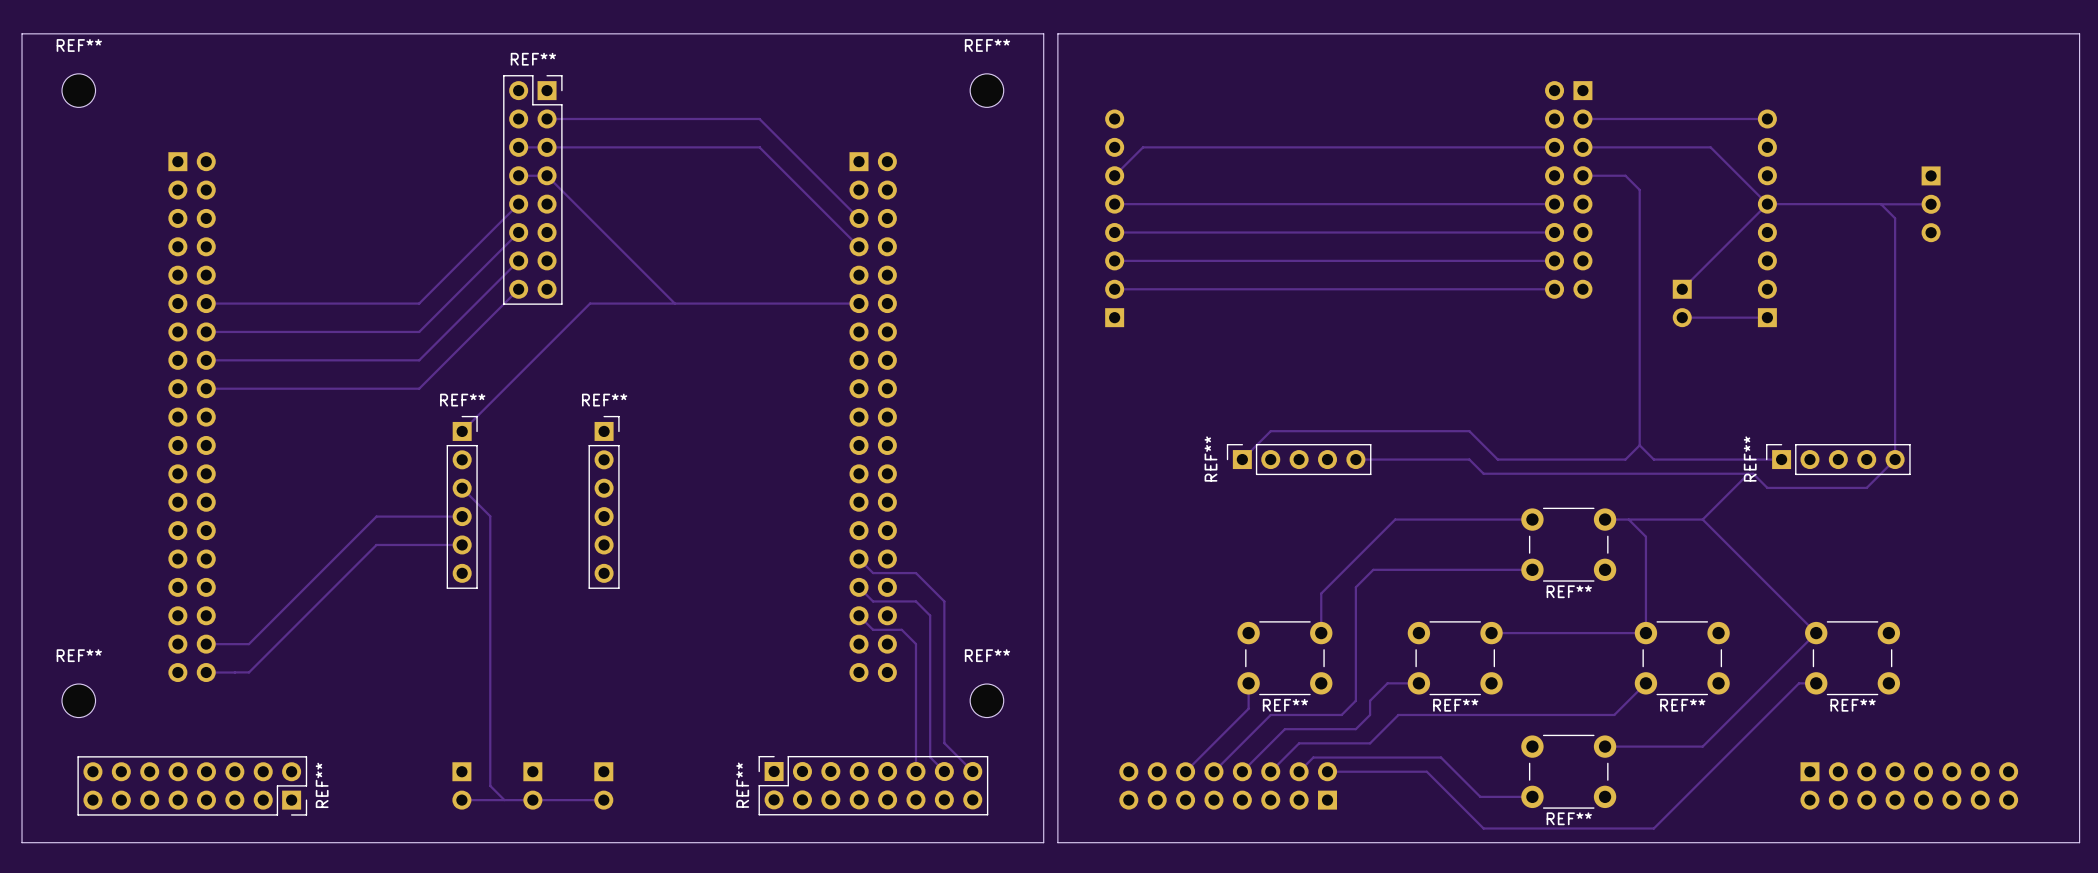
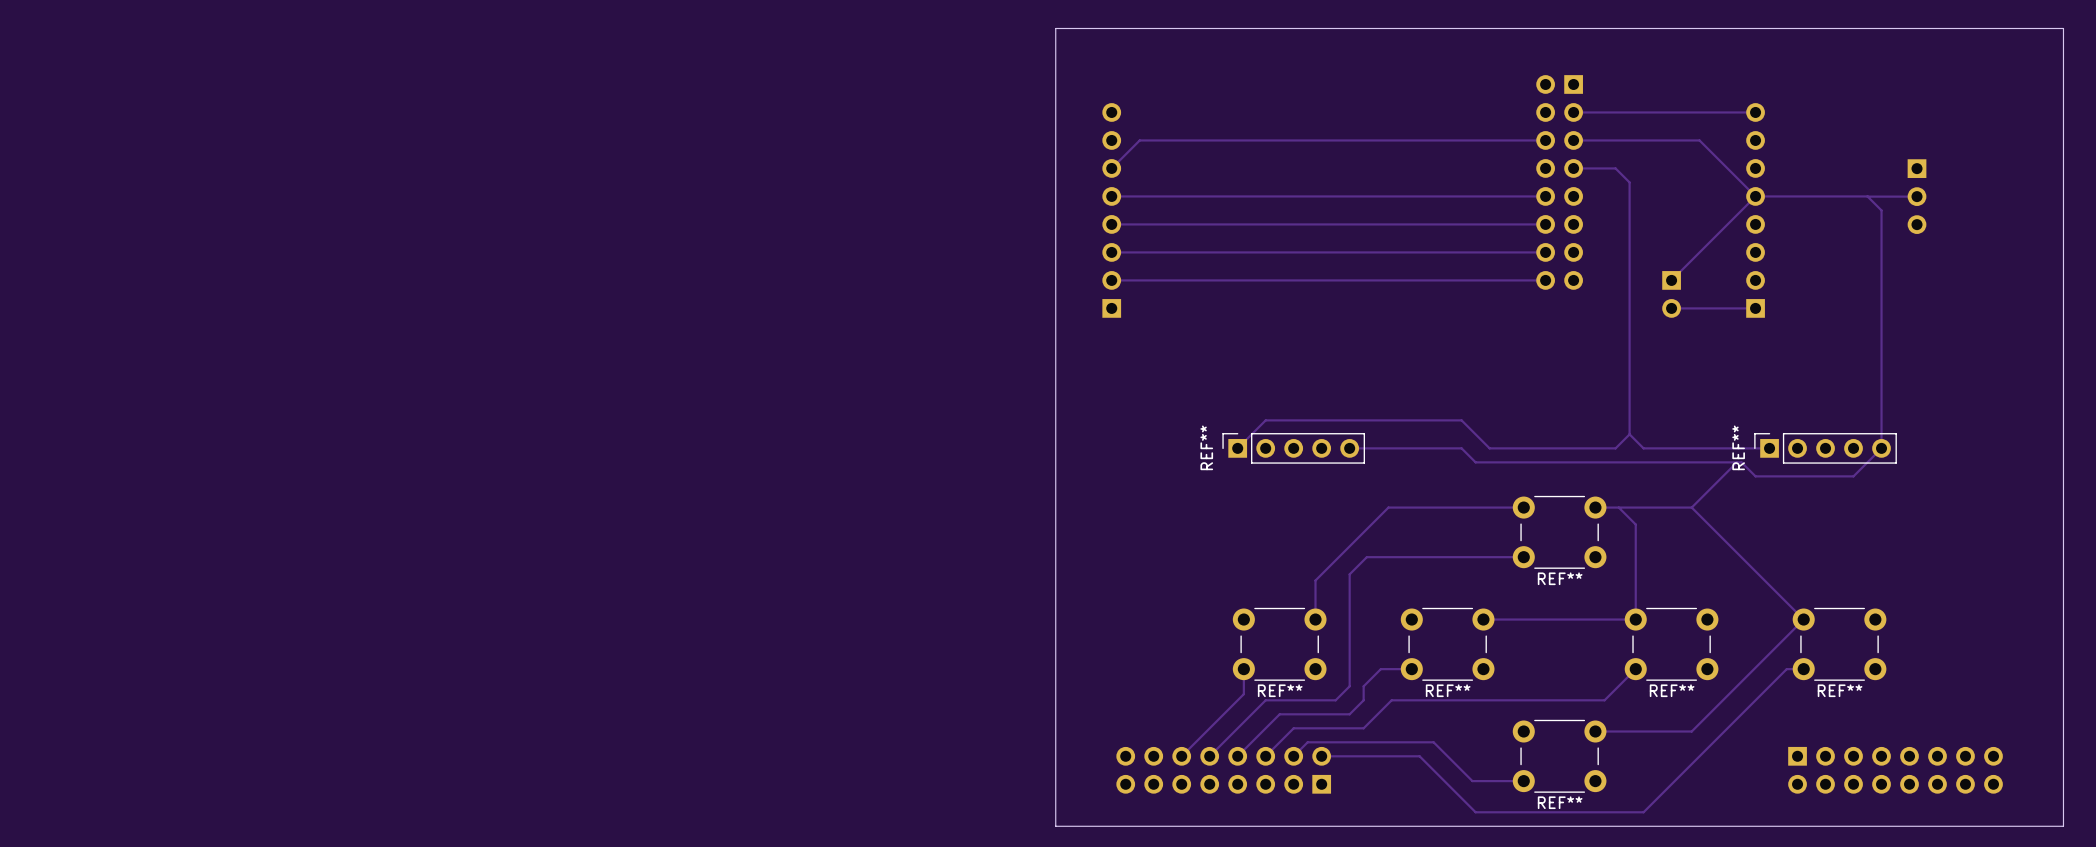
board edge: (22, 33) (1043, 33) (1043, 842) (22, 842) (22, 33) -> none
REF**: (78, 90) -> none
REF**: (986, 90) -> none
track: (547, 118) (759, 118) (859, 218) -> none
track: (518, 147) (759, 147) (859, 246) -> none
track: (518, 175) (547, 175) (674, 303) -> none
REF**: (532, 189) -> none
track: (518, 204) (419, 303) (206, 303) -> none
track: (518, 232) (419, 331) (206, 331) -> none
track: (518, 260) (419, 360) (206, 360) -> none
track: (518, 289) (419, 388) (206, 388) -> none
track: (859, 303) (590, 303) (462, 431) -> none
part: (192, 417) -> none
part: (873, 417) -> none
track: (462, 488) (490, 516) (490, 785) (504, 800) -> none
REF**: (462, 502) -> none
REF**: (604, 502) -> none
track: (462, 516) (376, 516) (248, 644) (206, 644) -> none
track: (462, 544) (376, 544) (249, 672) (234, 672) -> none
track: (859, 558) (873, 573) (915, 573) (944, 601) (944, 743) (972, 771) -> none
track: (859, 587) (873, 601) (915, 601) (930, 615) (930, 757) (944, 771) -> none
track: (859, 615) (873, 629) (901, 629) (915, 644) (915, 771) -> none
track: (206, 672) (234, 672) -> none
REF**: (78, 700) -> none
REF**: (986, 700) -> none
REF**: (192, 785) -> none
part: (461, 785) -> none
part: (532, 785) -> none
part: (603, 785) -> none
REF**: (873, 785) -> none
track: (461, 800) (603, 800) -> none

